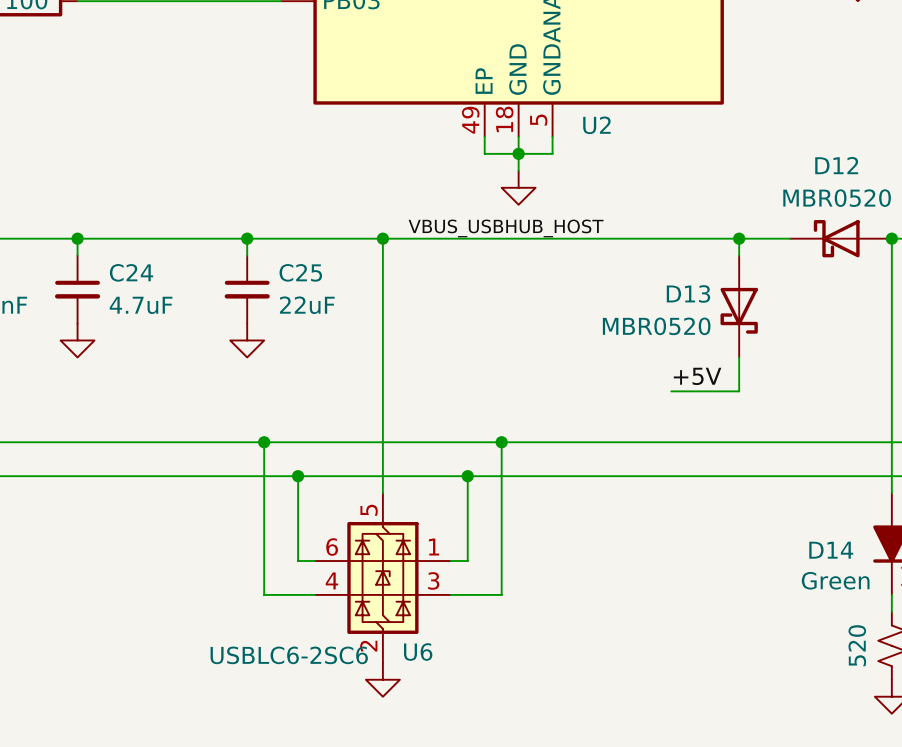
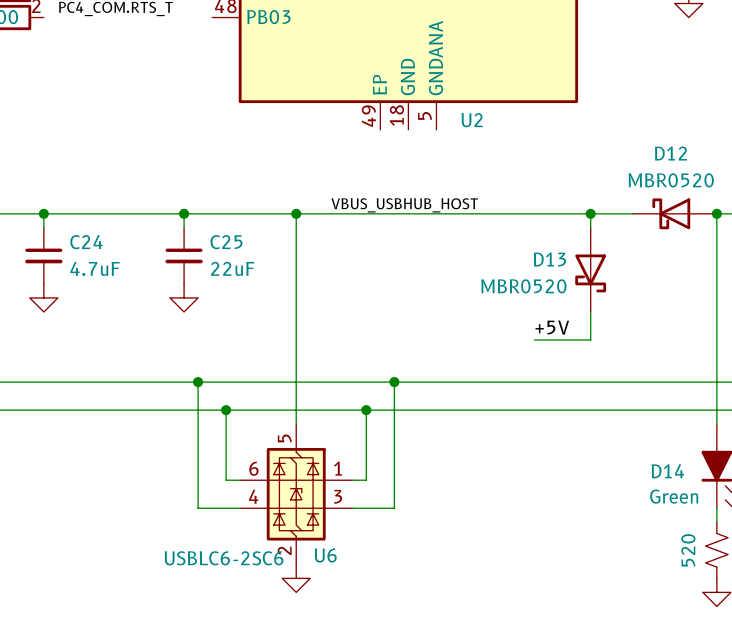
wire: (77, 1) (281, 1) -> none
wire: (484, 136) (484, 153) (552, 153) (552, 136) -> none
wire: (518, 136) (518, 170) -> none
junction: (518, 153) -> none
power symbol: (518, 187) -> none

